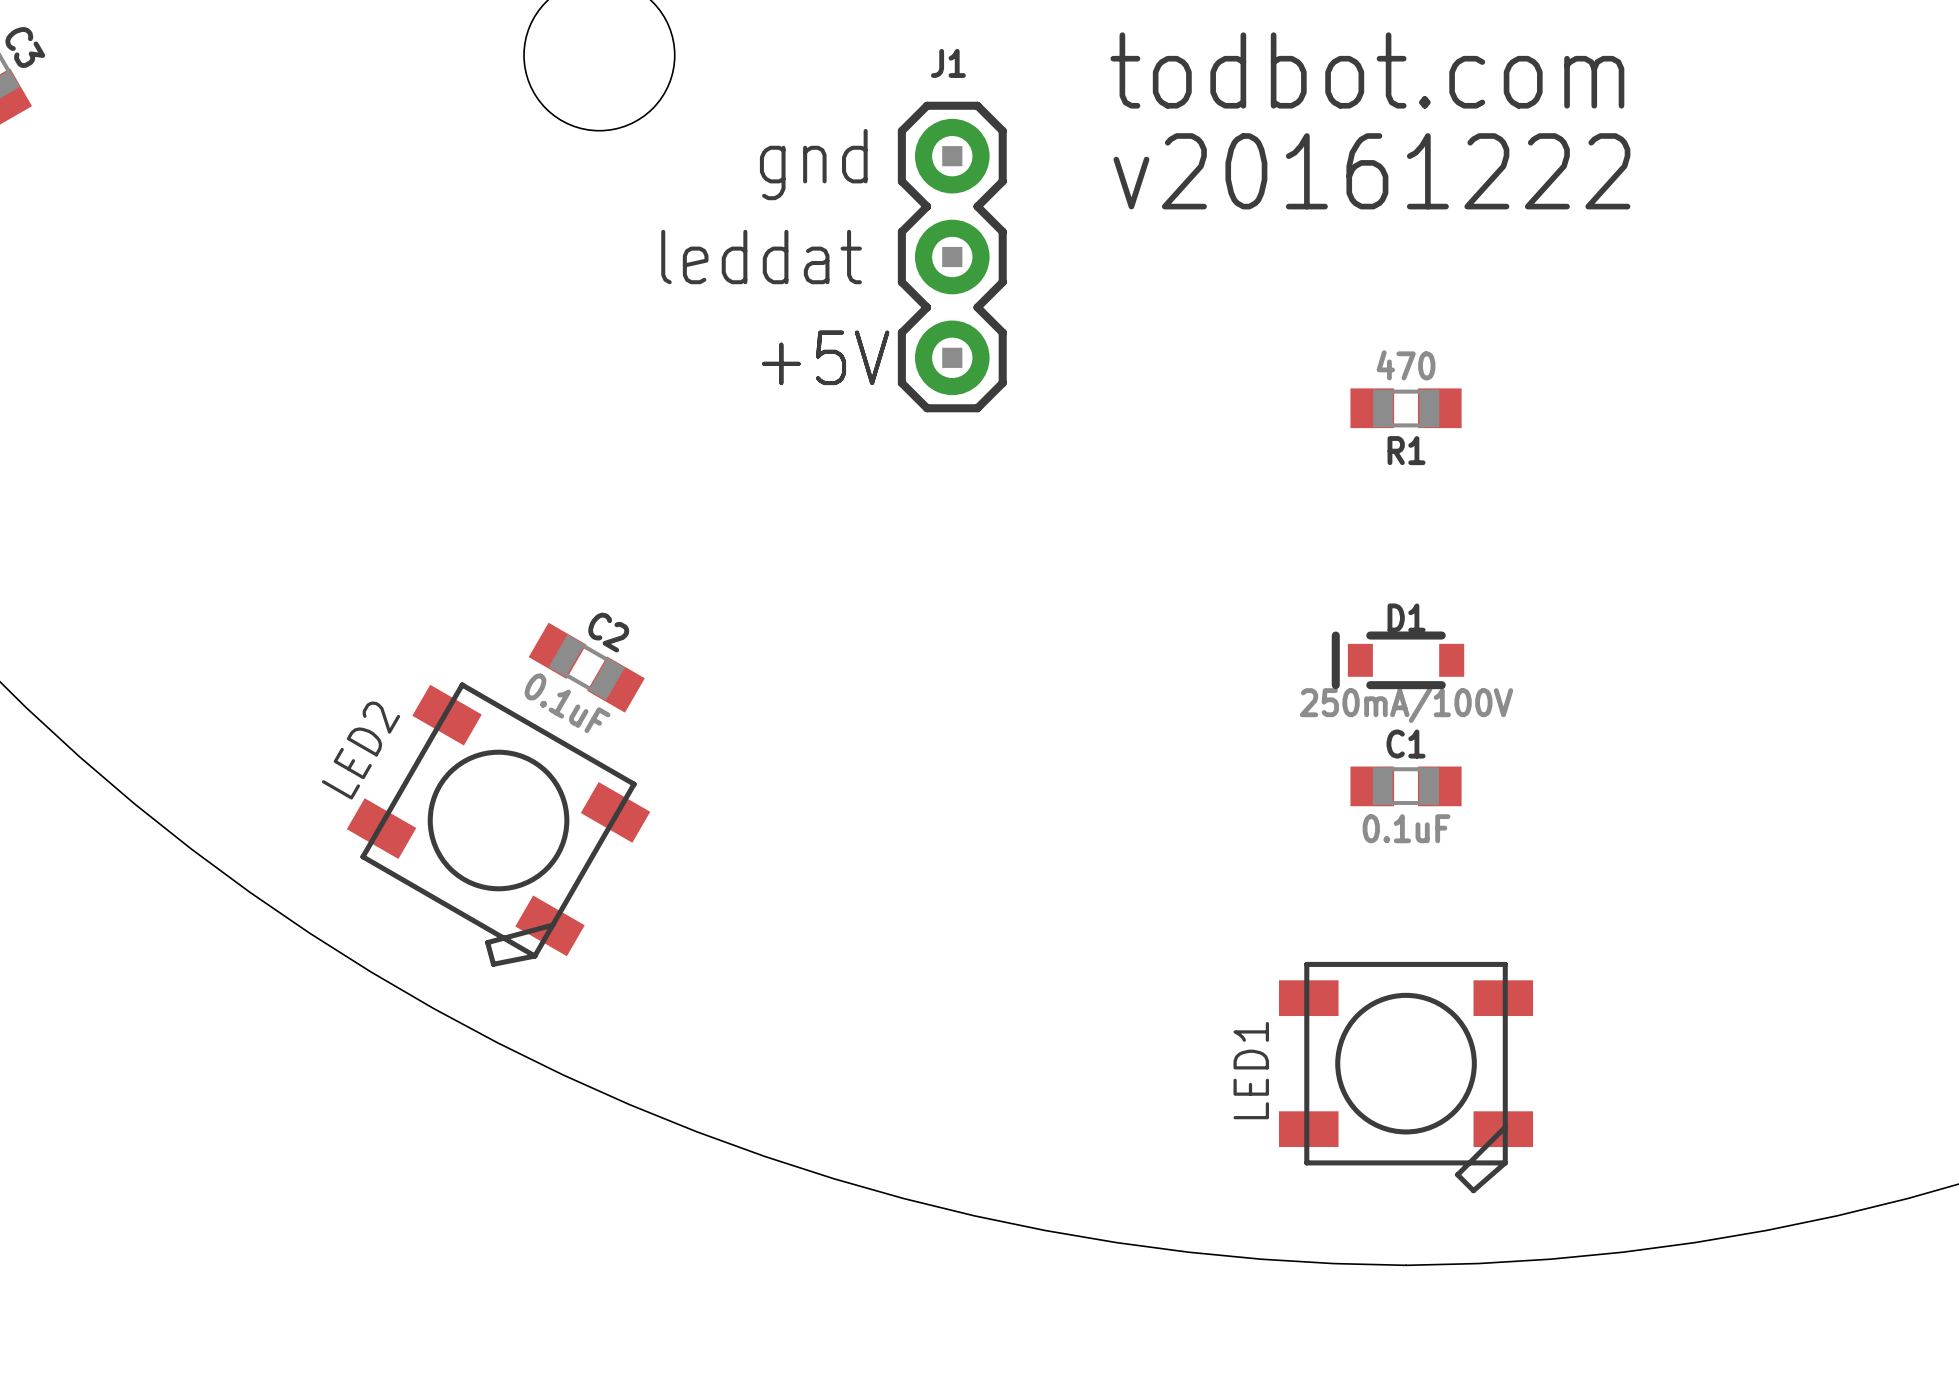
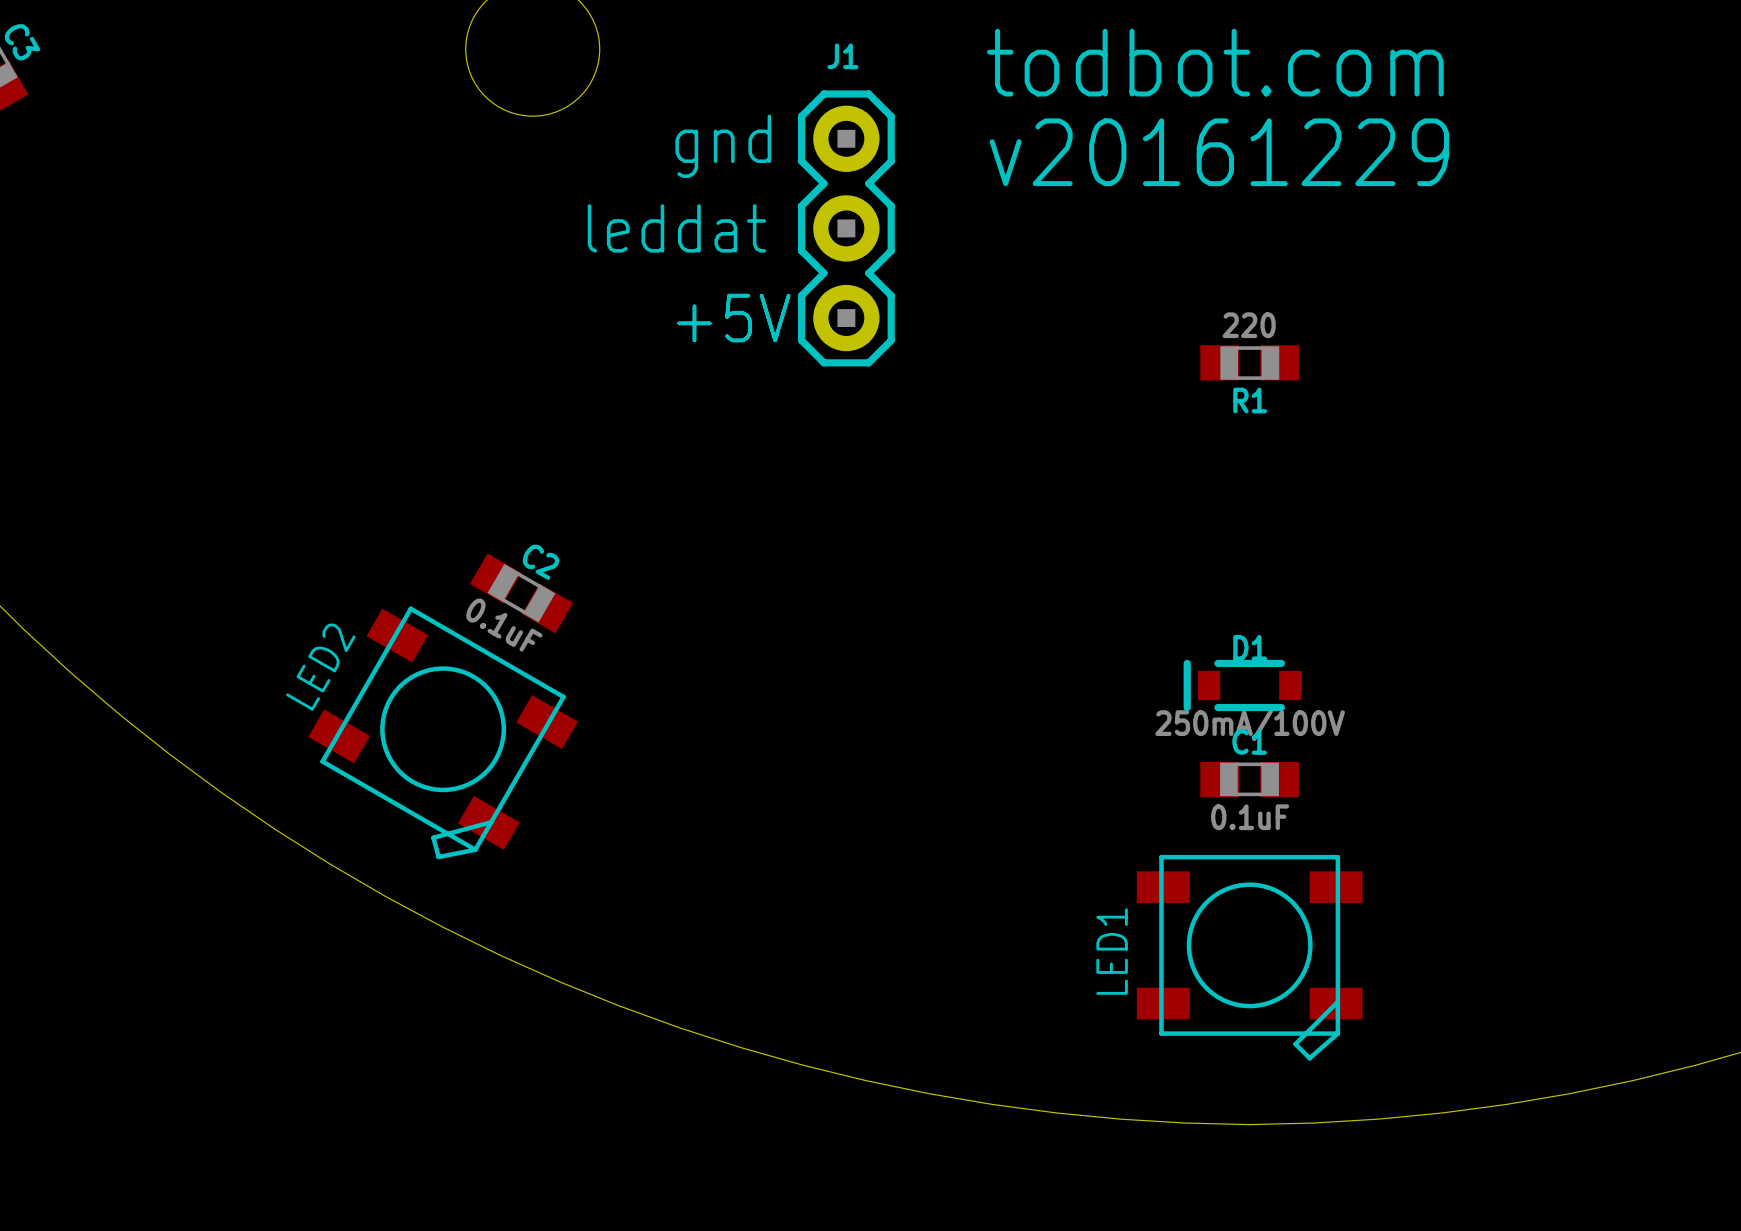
text: v20161222 (1371, 171) -> v20161229 (1219, 152)
R1 value: 470 (1406, 365) -> 220 (1249, 325)
D1 position: (1397, 660) -> (1242, 685)
C1 position: (1406, 786) -> (1249, 779)

